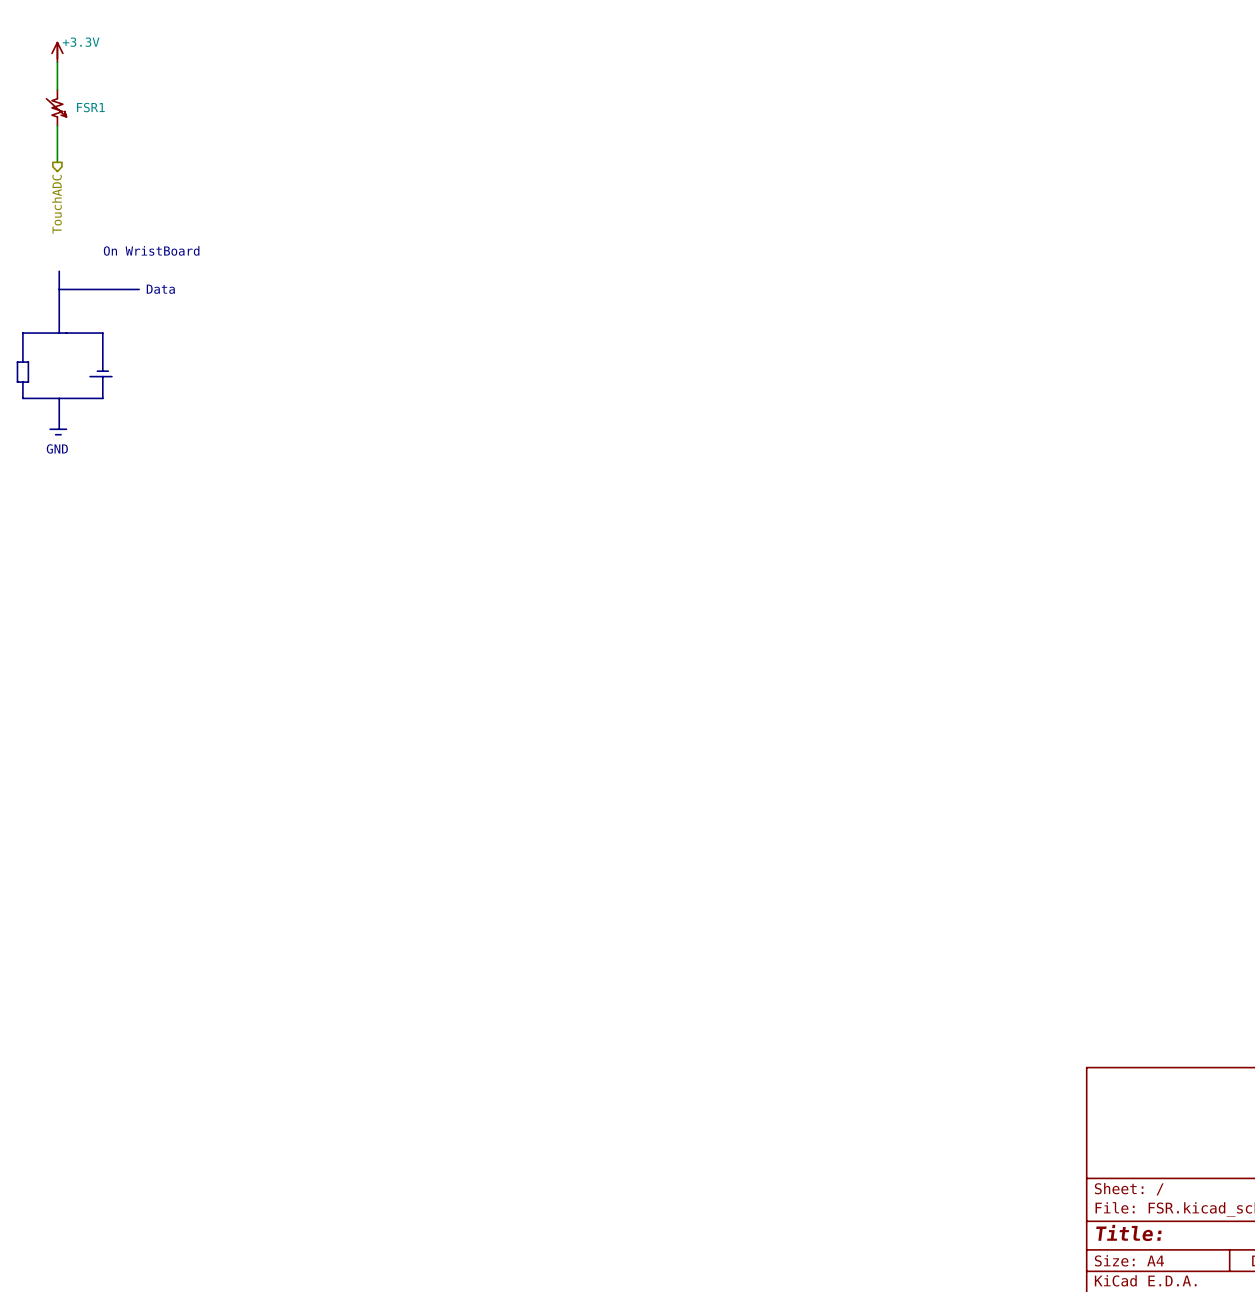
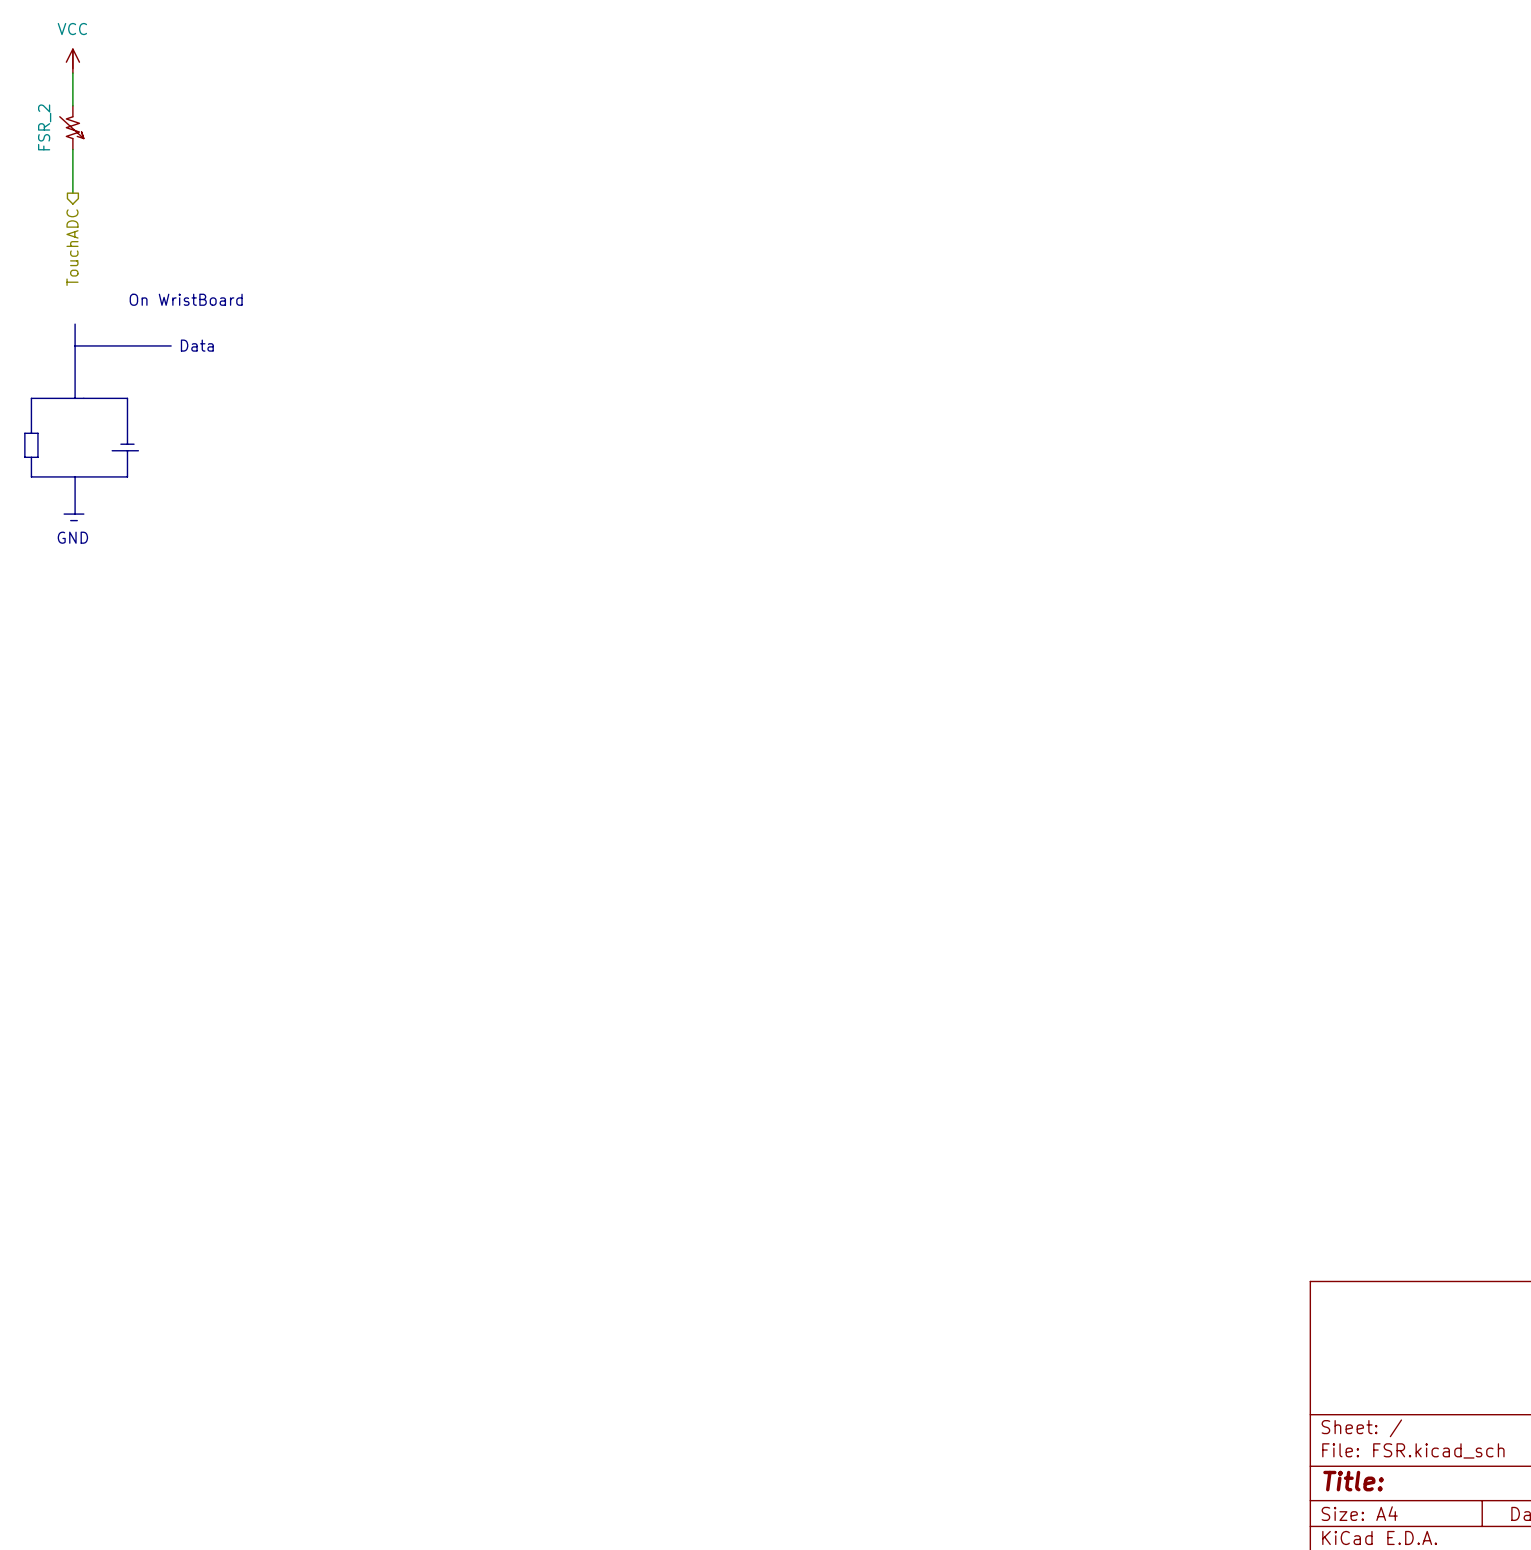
power symbol: +3.3V (57, 52) -> VCC (72, 61)
FSR1 name: FSR1 (90, 107) -> FSR_2 (44, 127)

